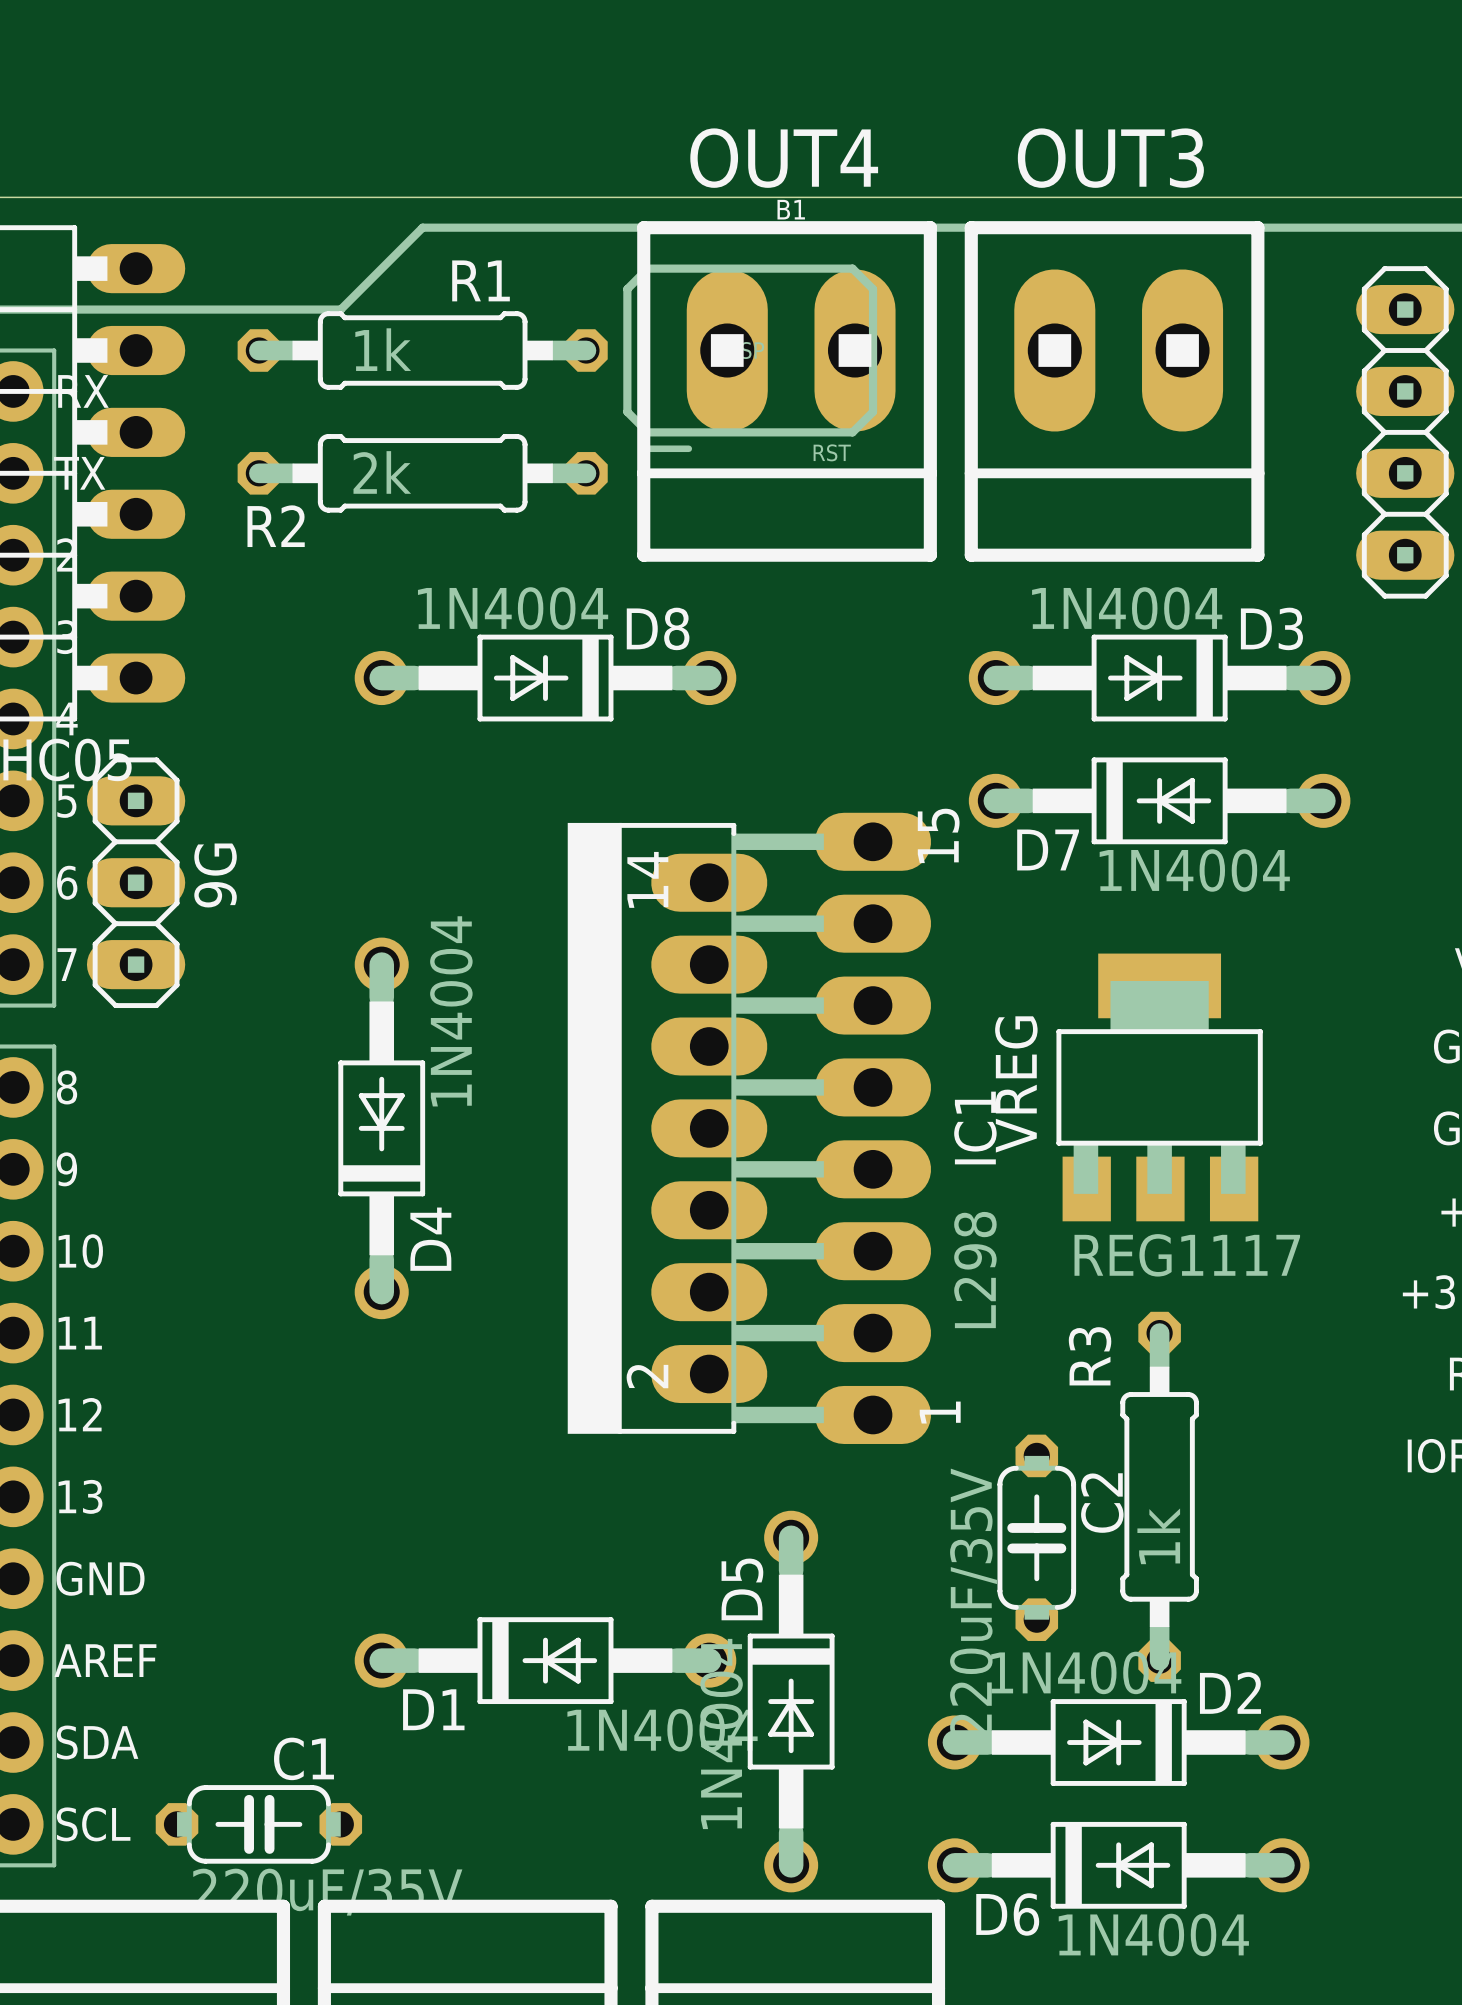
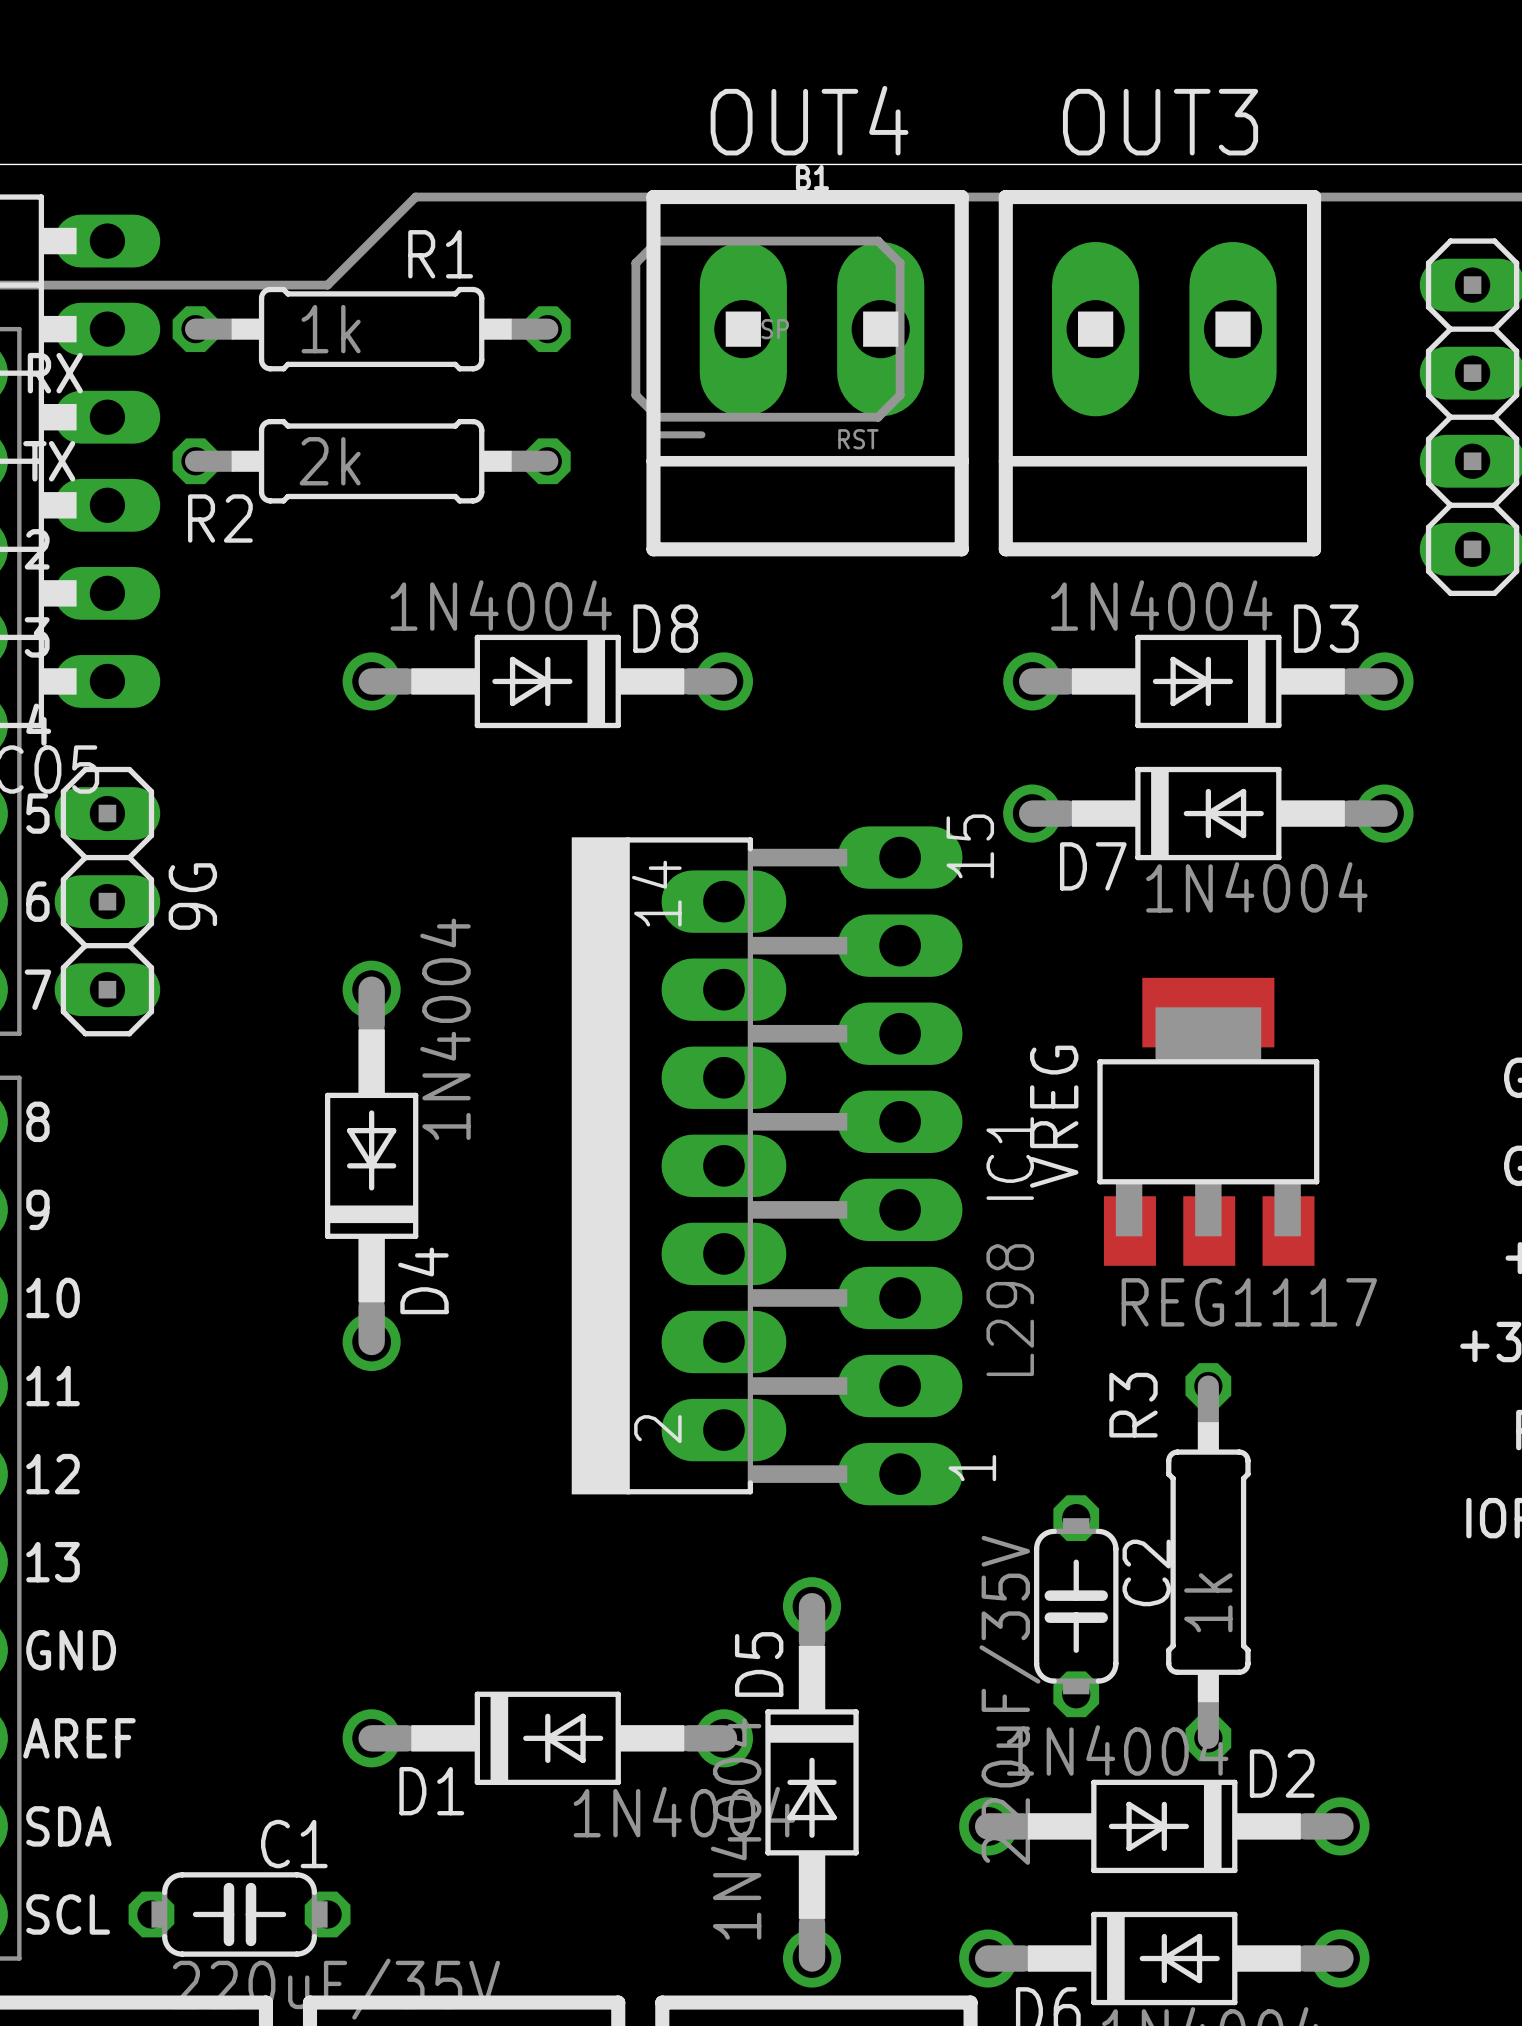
R1 position: (422, 350) -> (371, 329)
R2 position: (422, 473) -> (371, 461)

